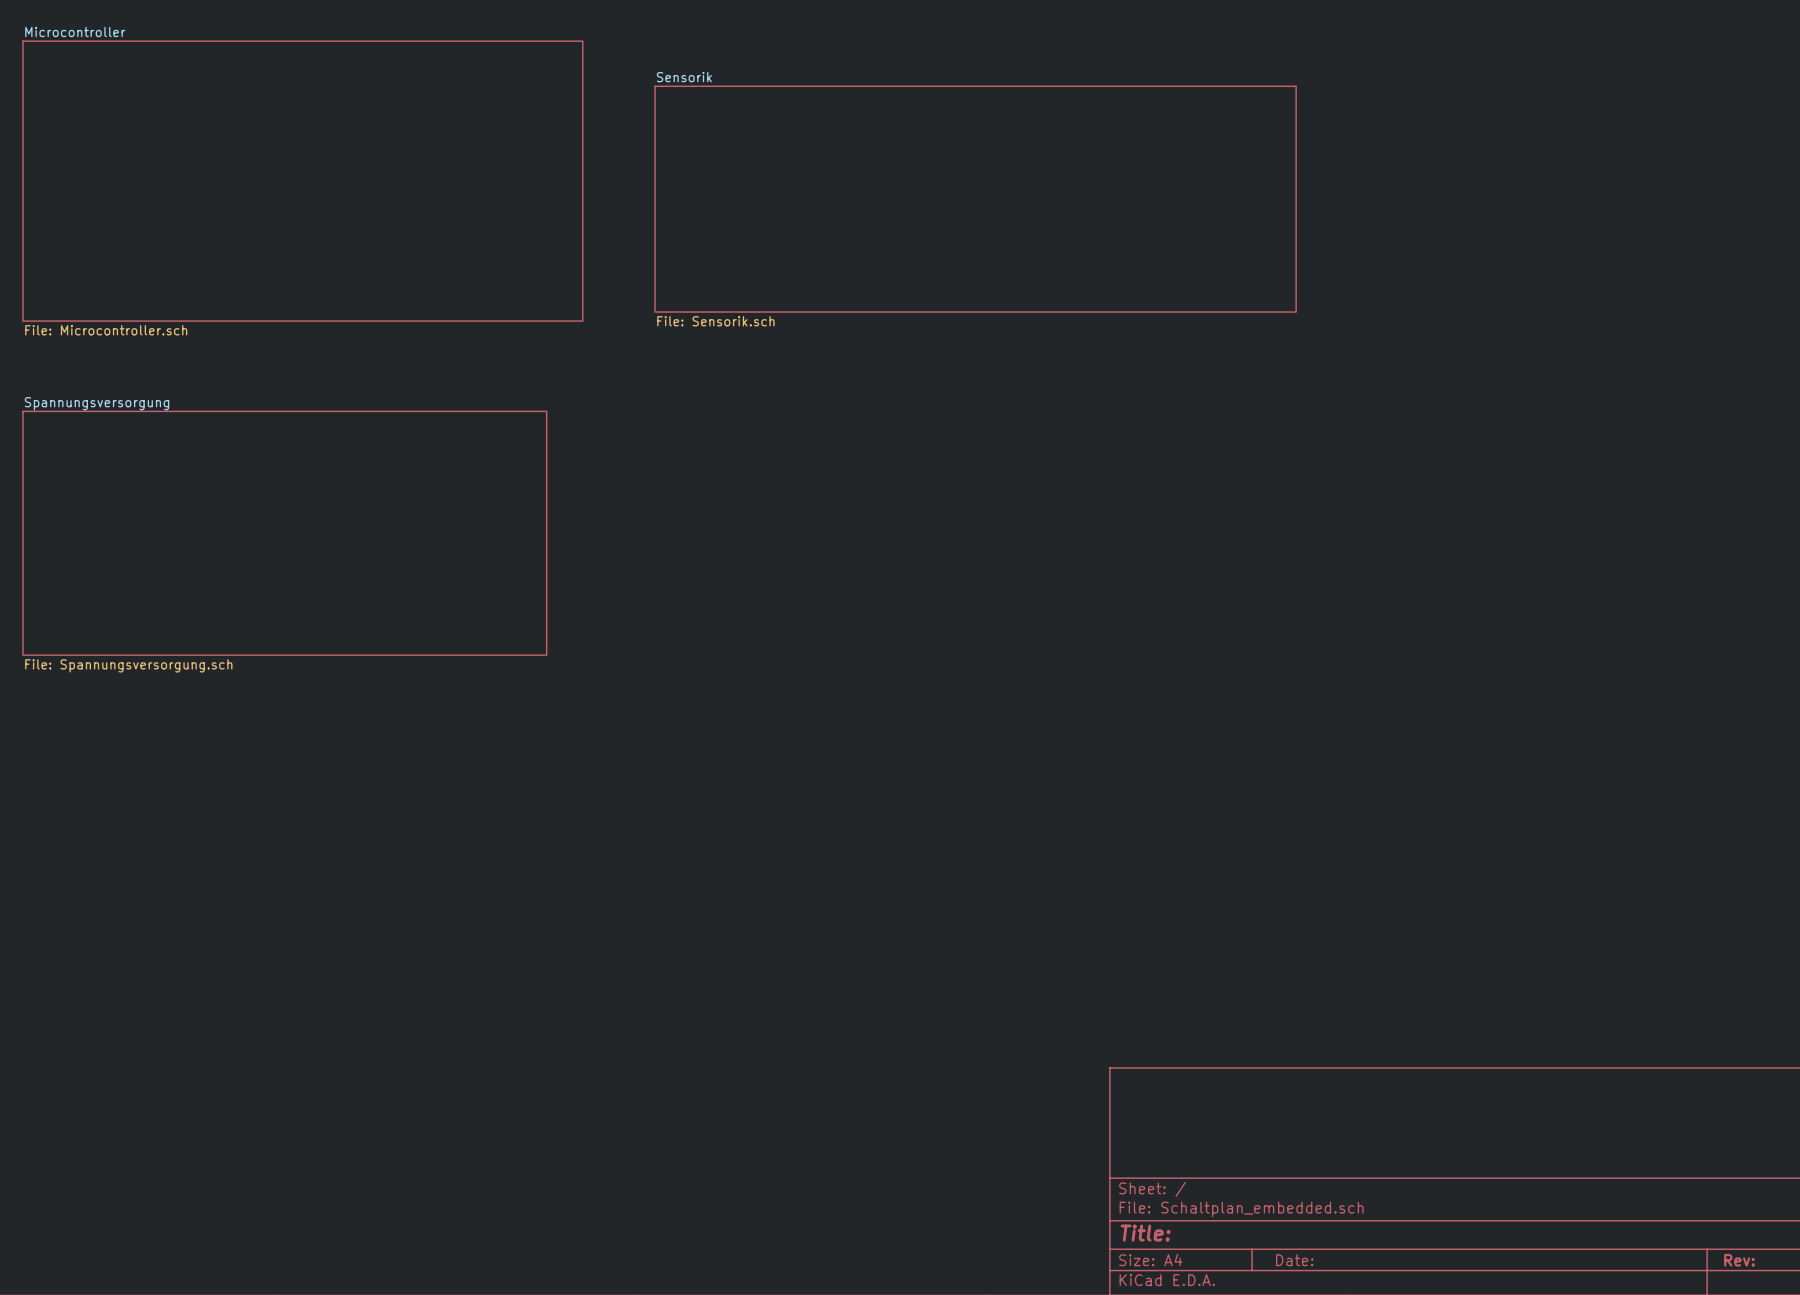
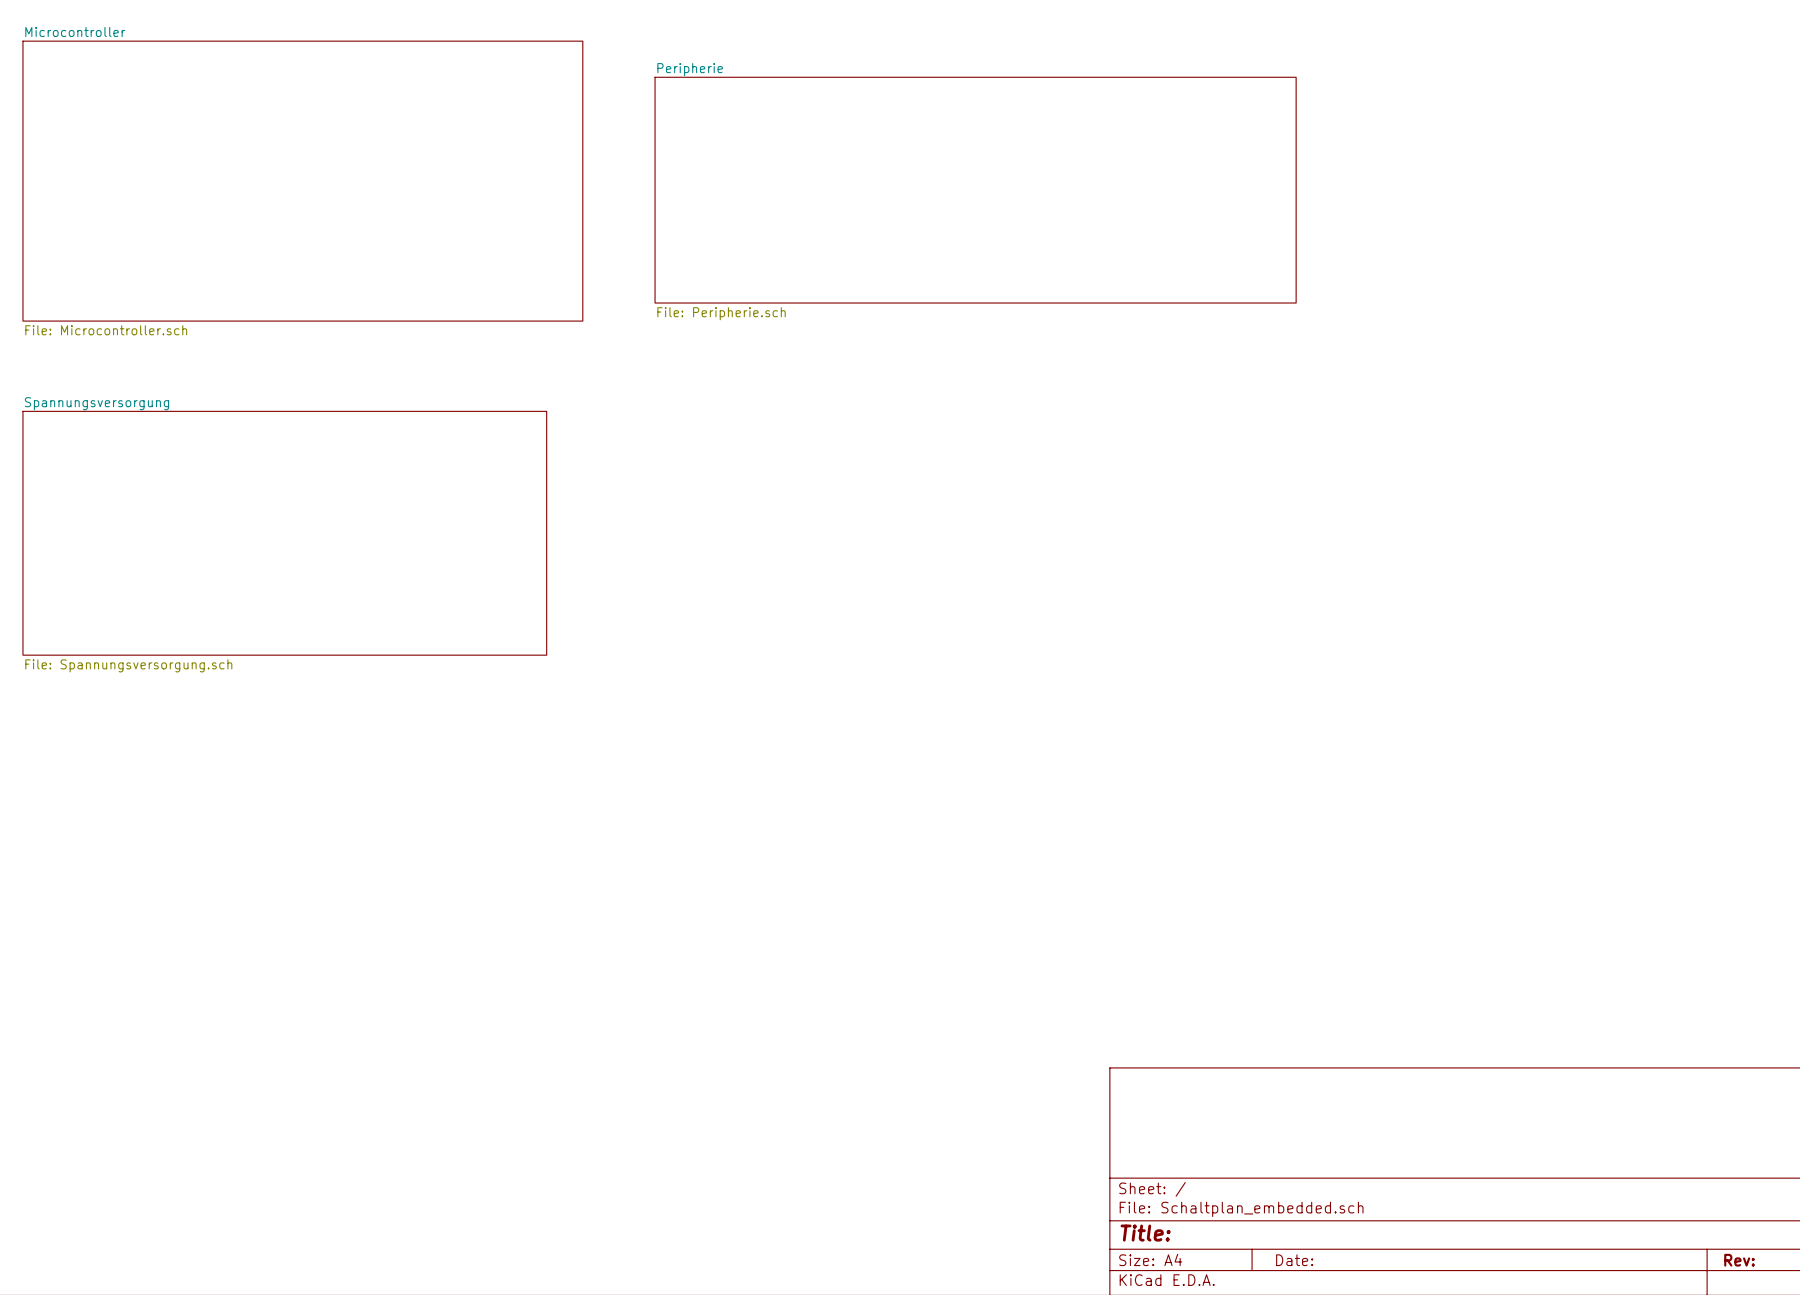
sheet Peripherie: none -> File: Peripherie.sch (975, 190)
sheet Sensorik: File: Sensorik.sch (975, 199) -> none

